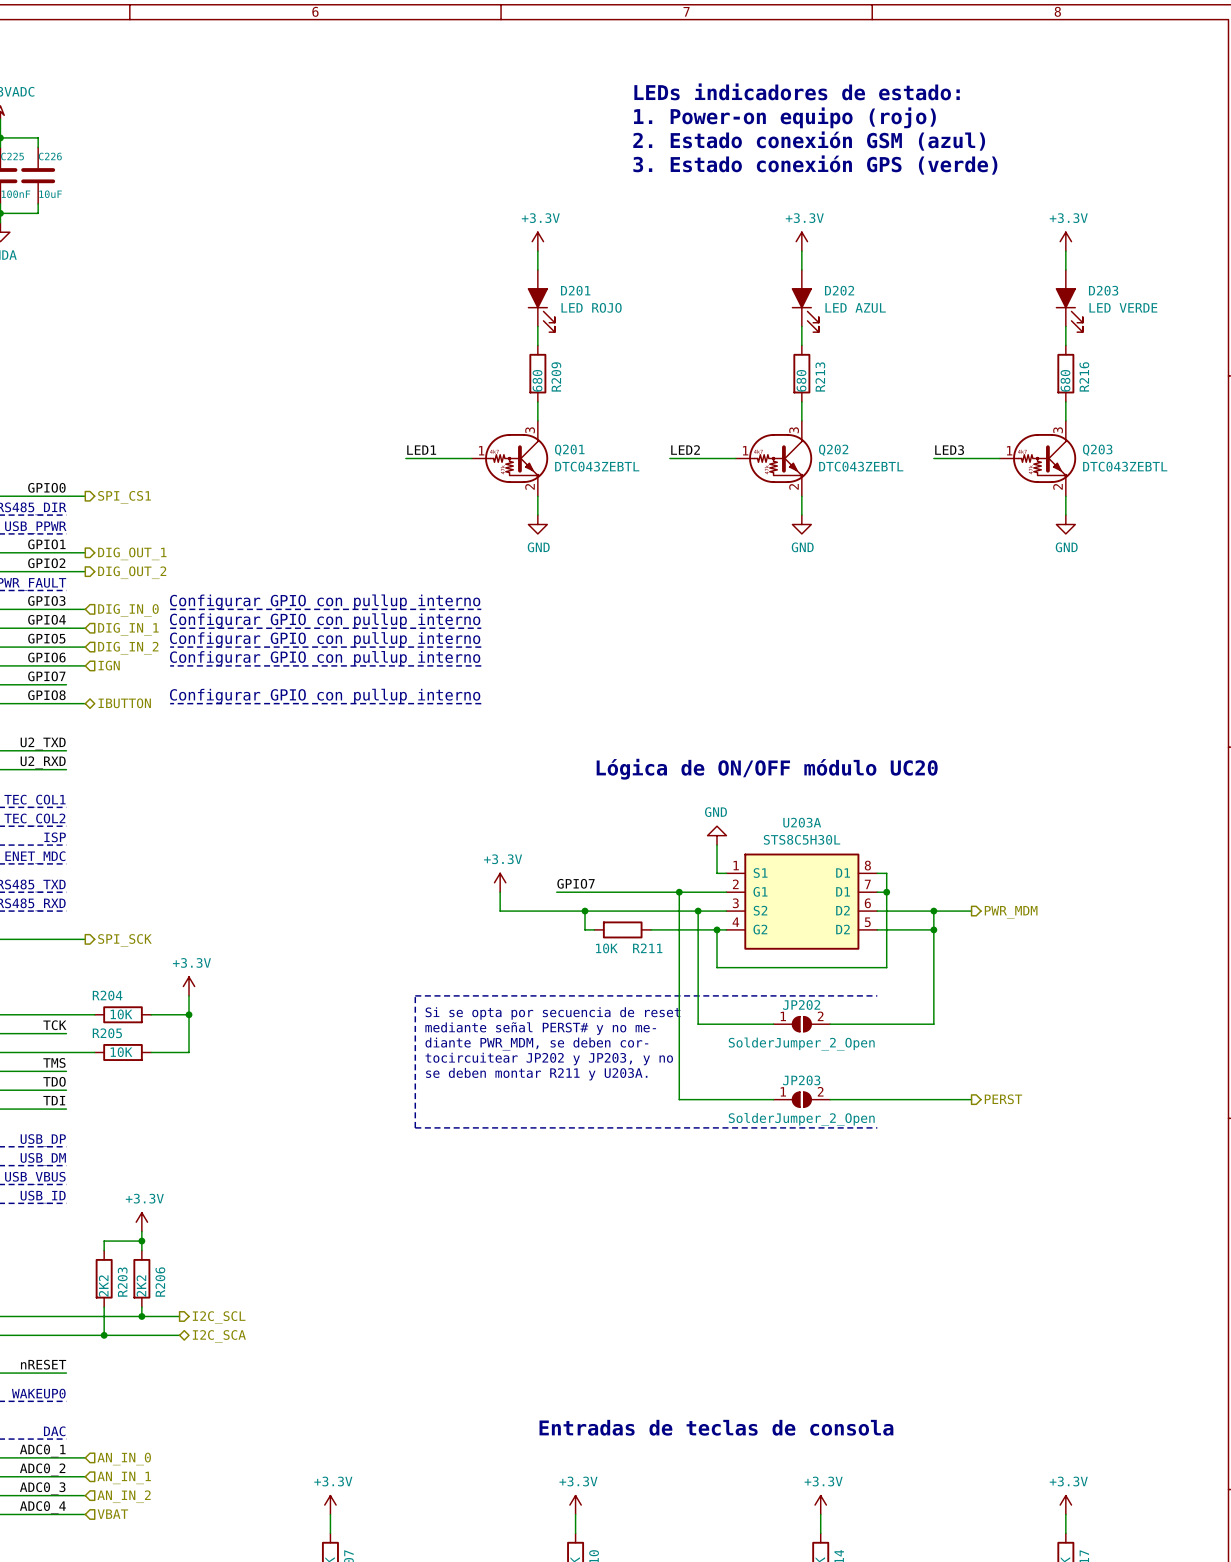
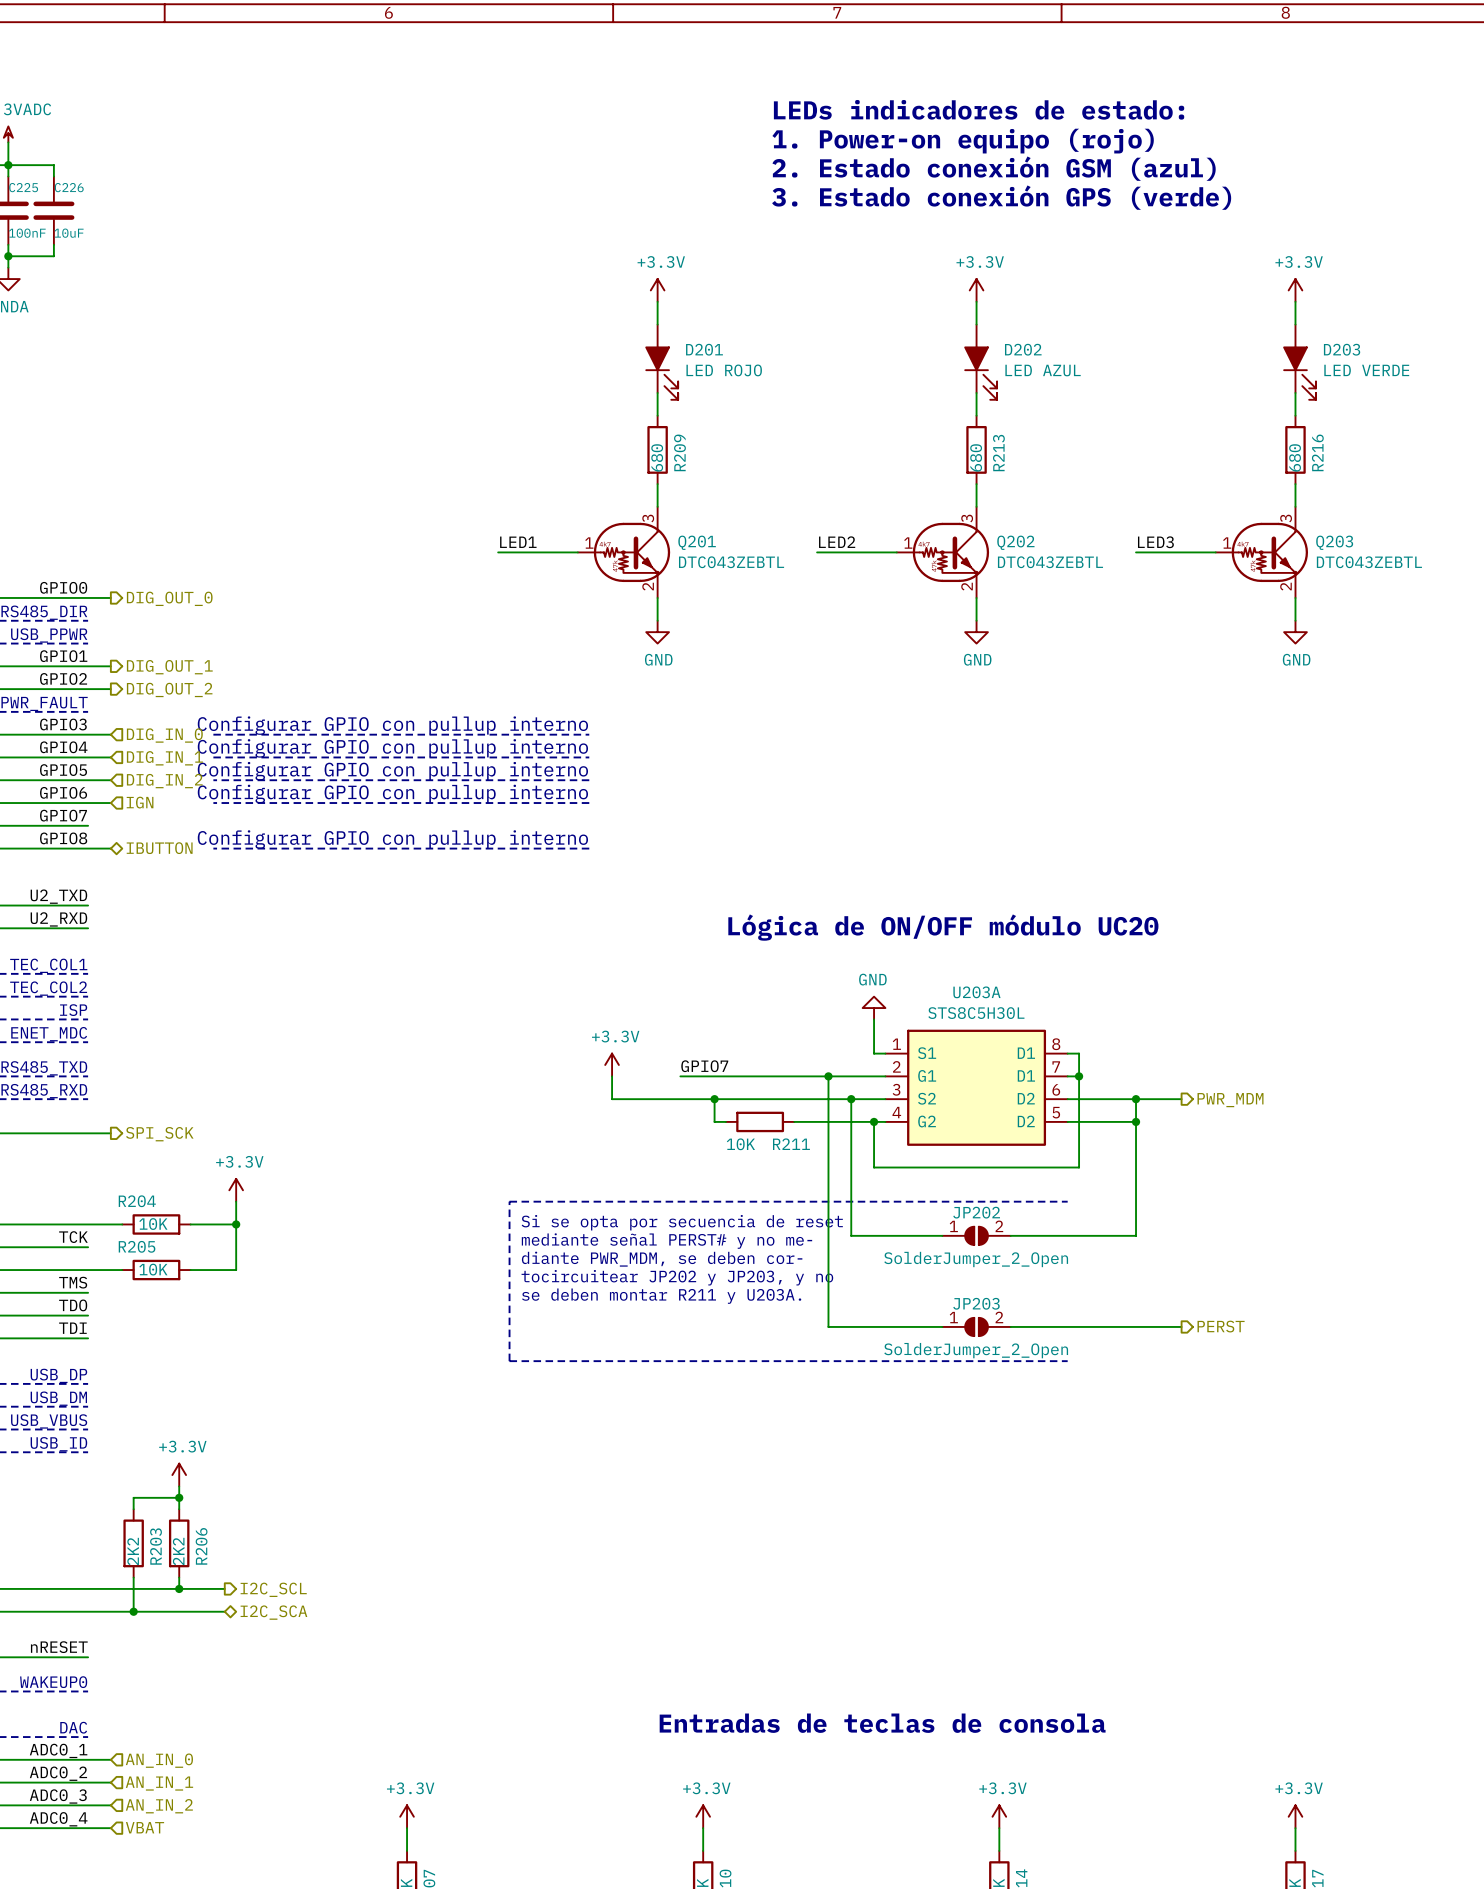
hierarchical label: SPI_CS1 (124, 497) -> DIG_OUT_0 (169, 598)

